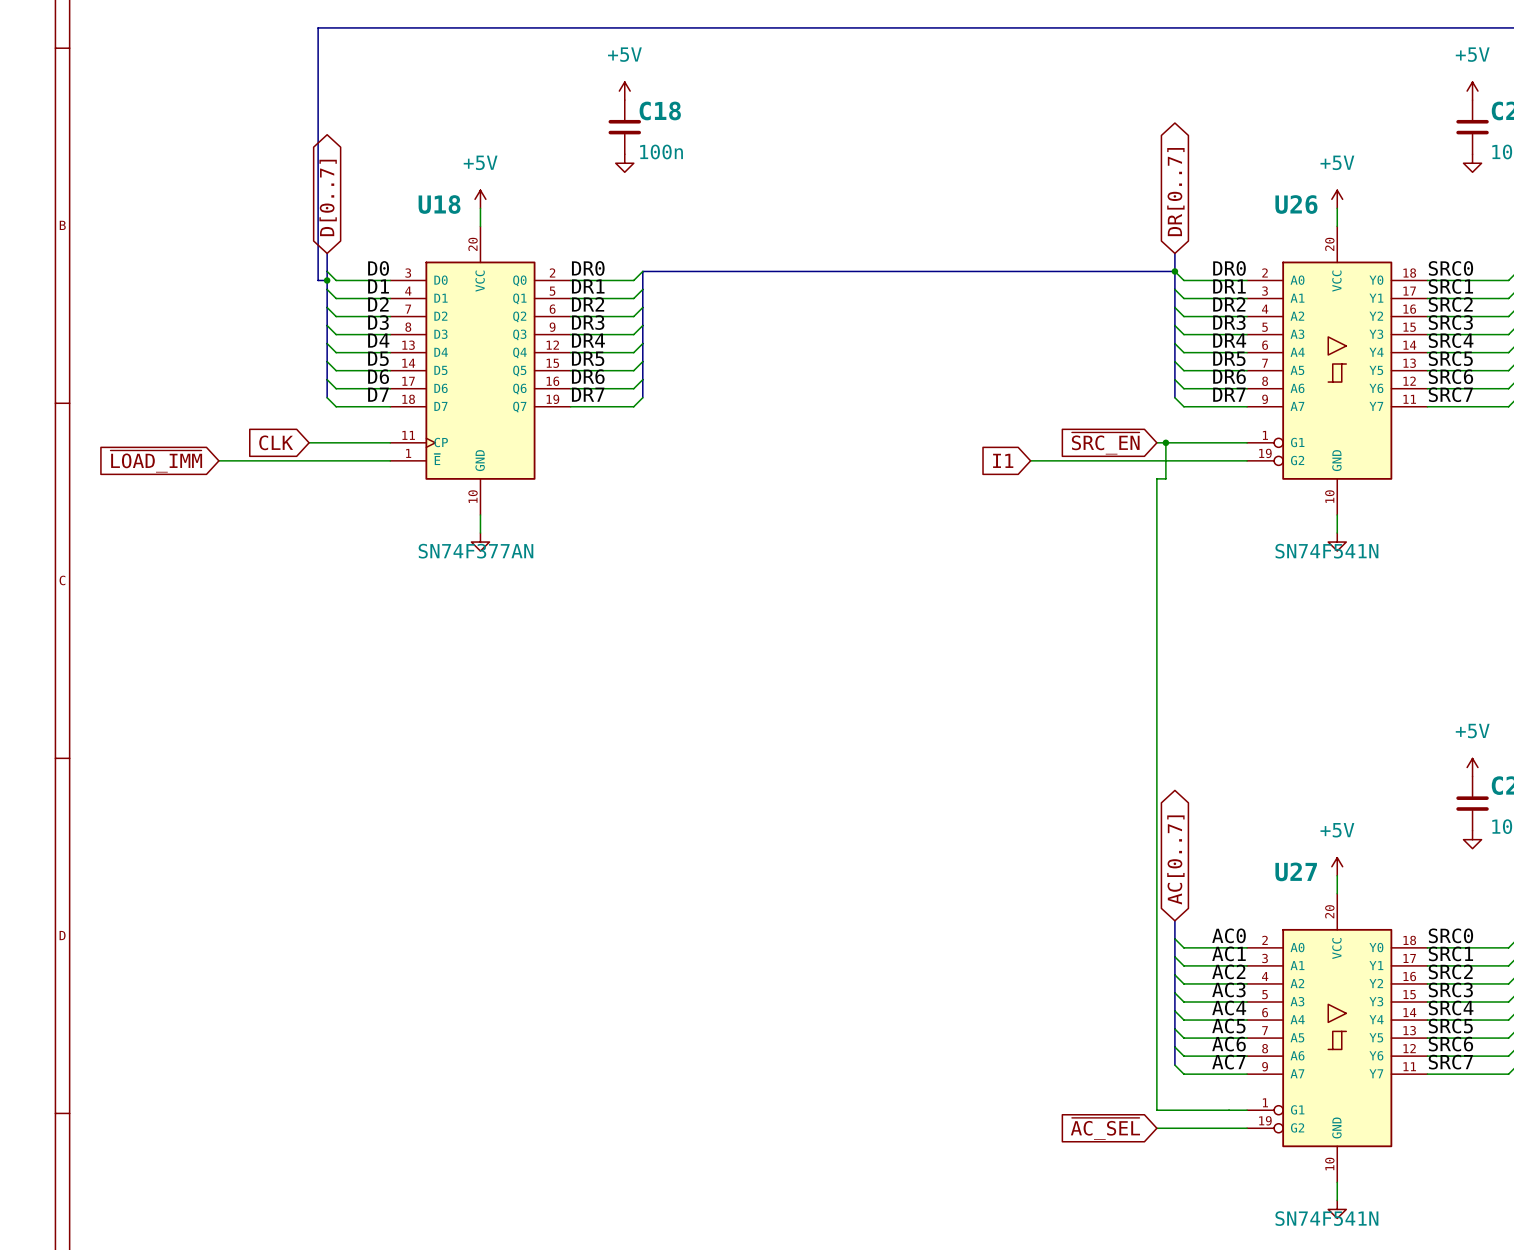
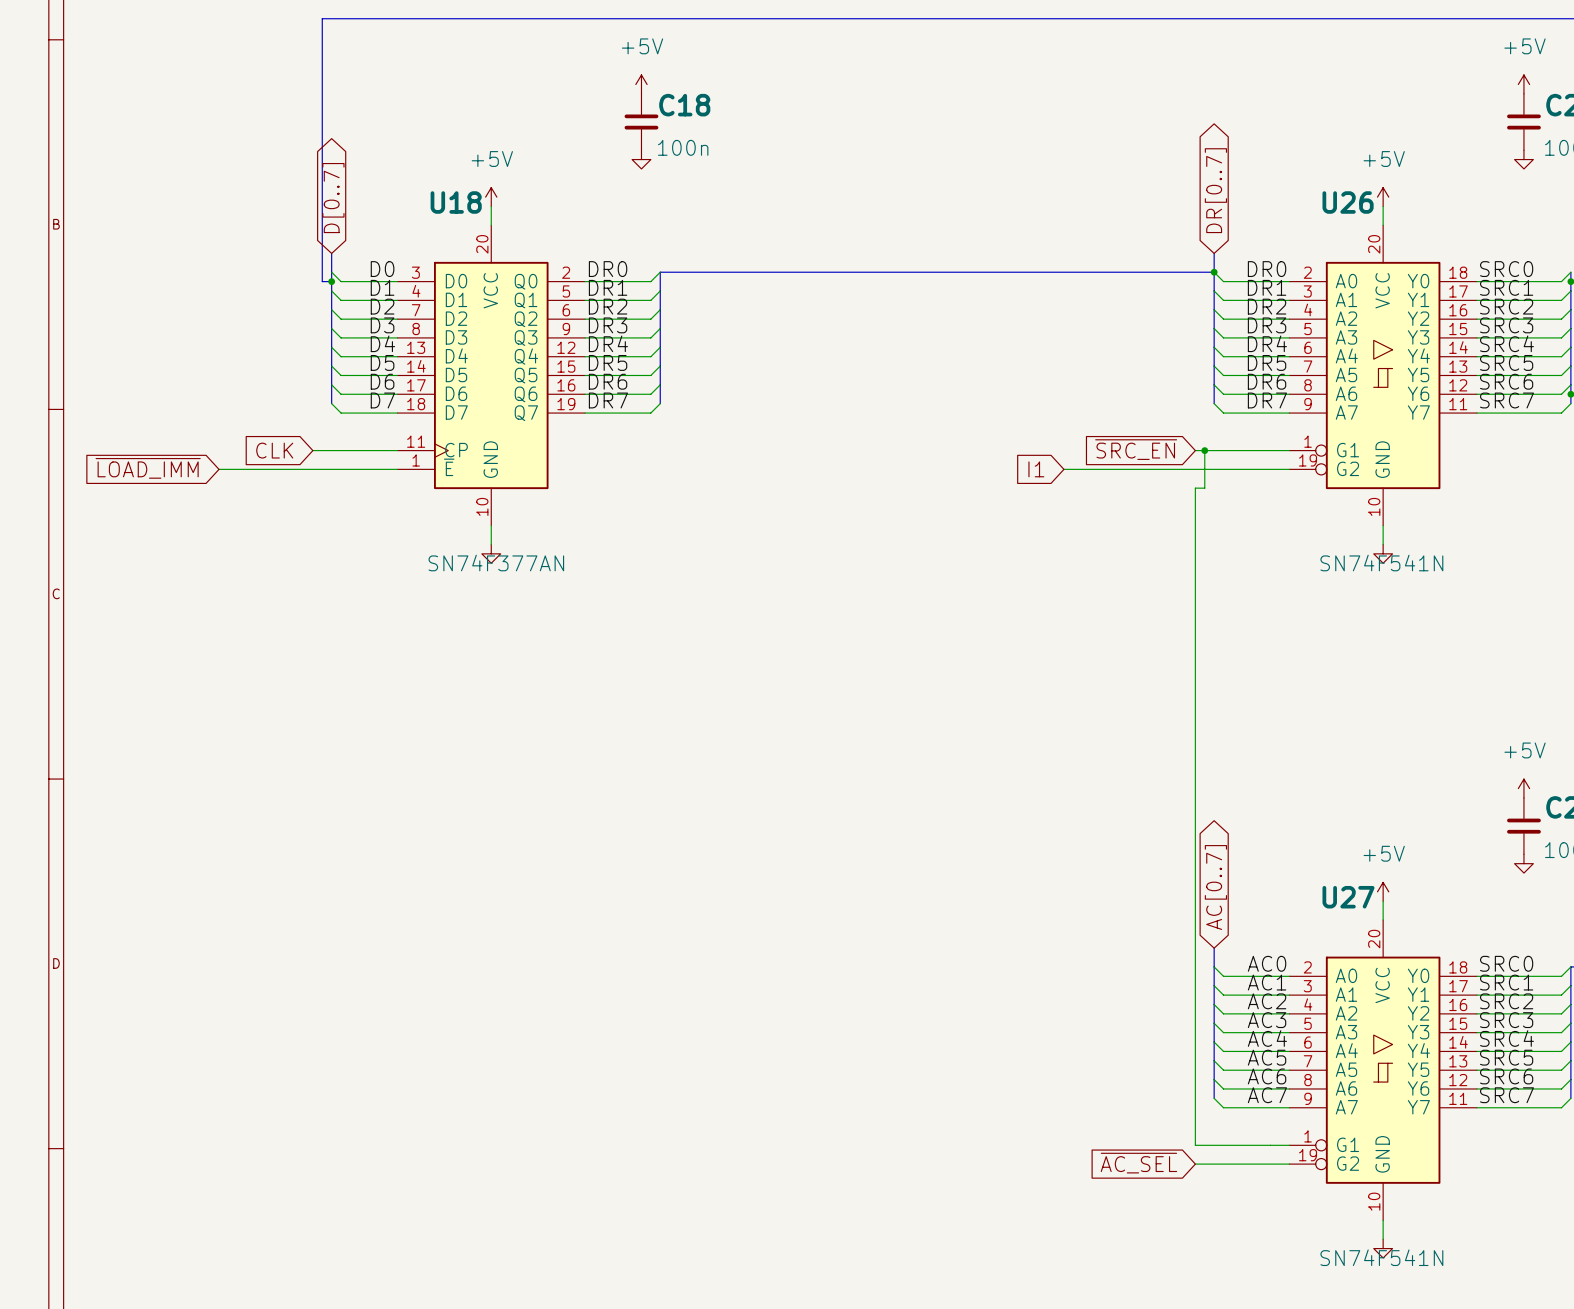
U18 symbol: [390, 226, 571, 515] -> [397, 225, 586, 526]
U26 symbol: [1247, 226, 1428, 515] -> [1289, 225, 1478, 526]
U27 symbol: [1247, 893, 1428, 1183] -> [1289, 920, 1478, 1221]

